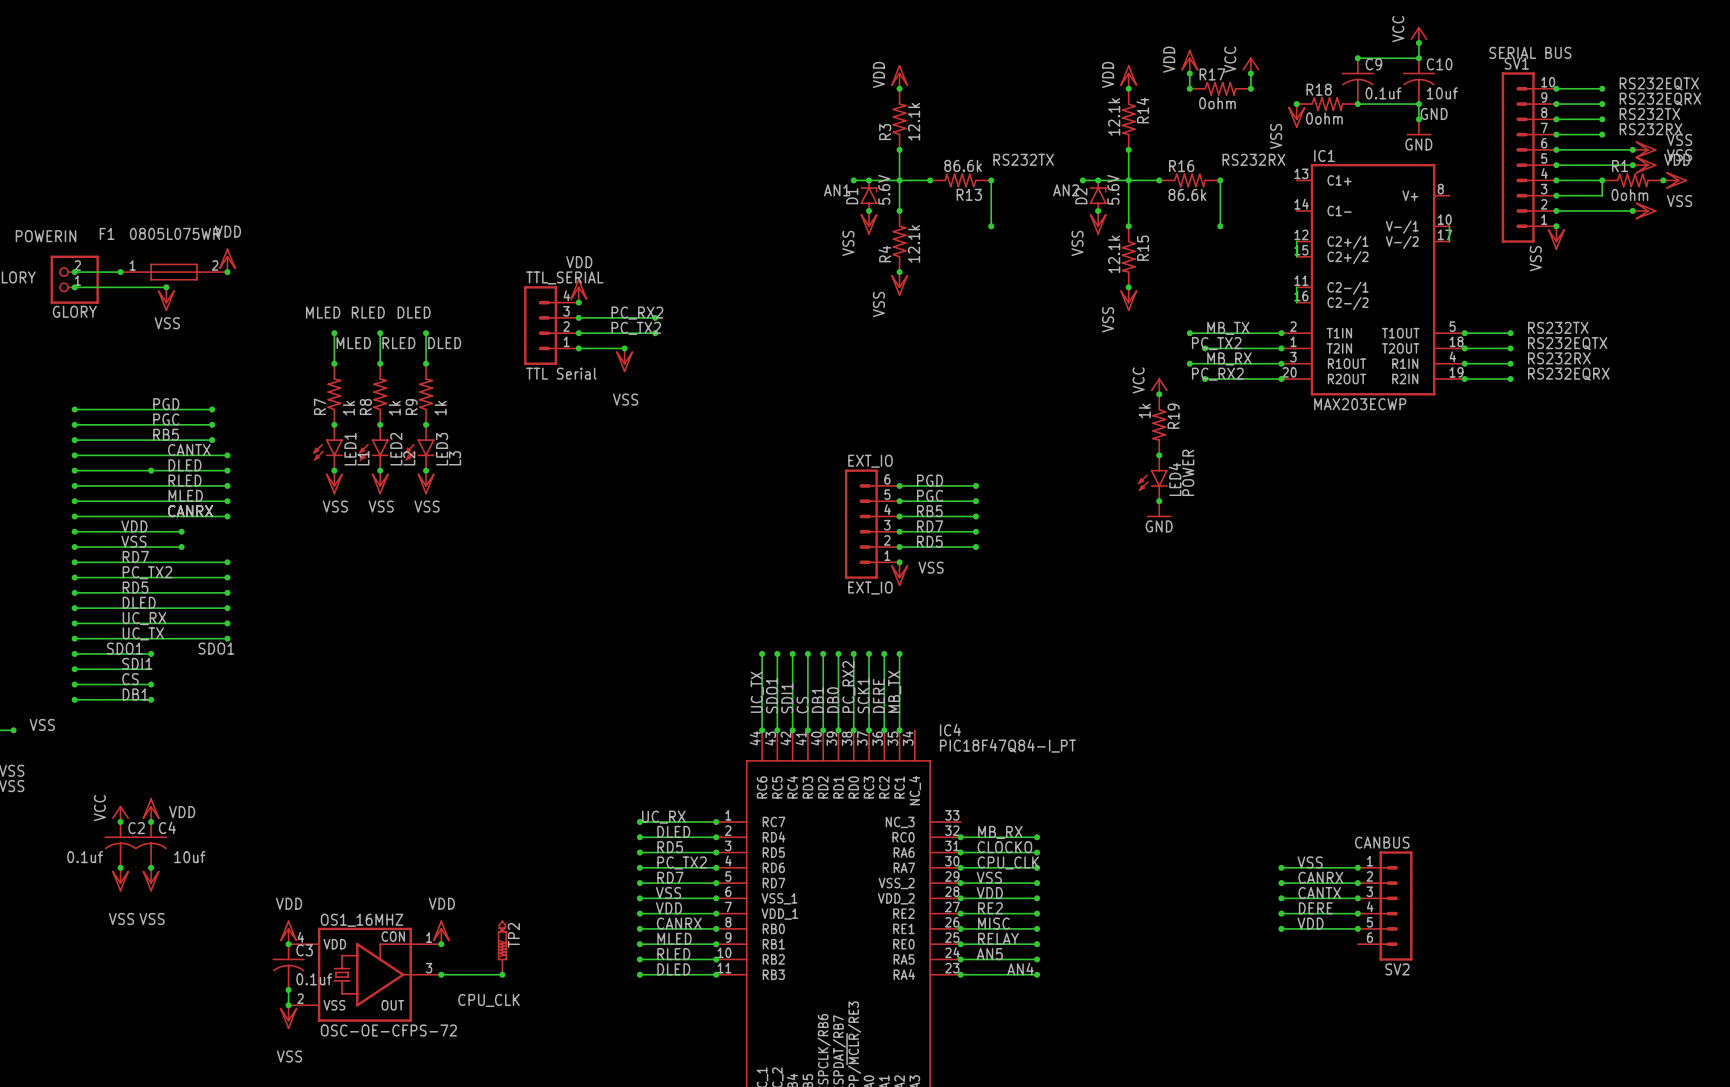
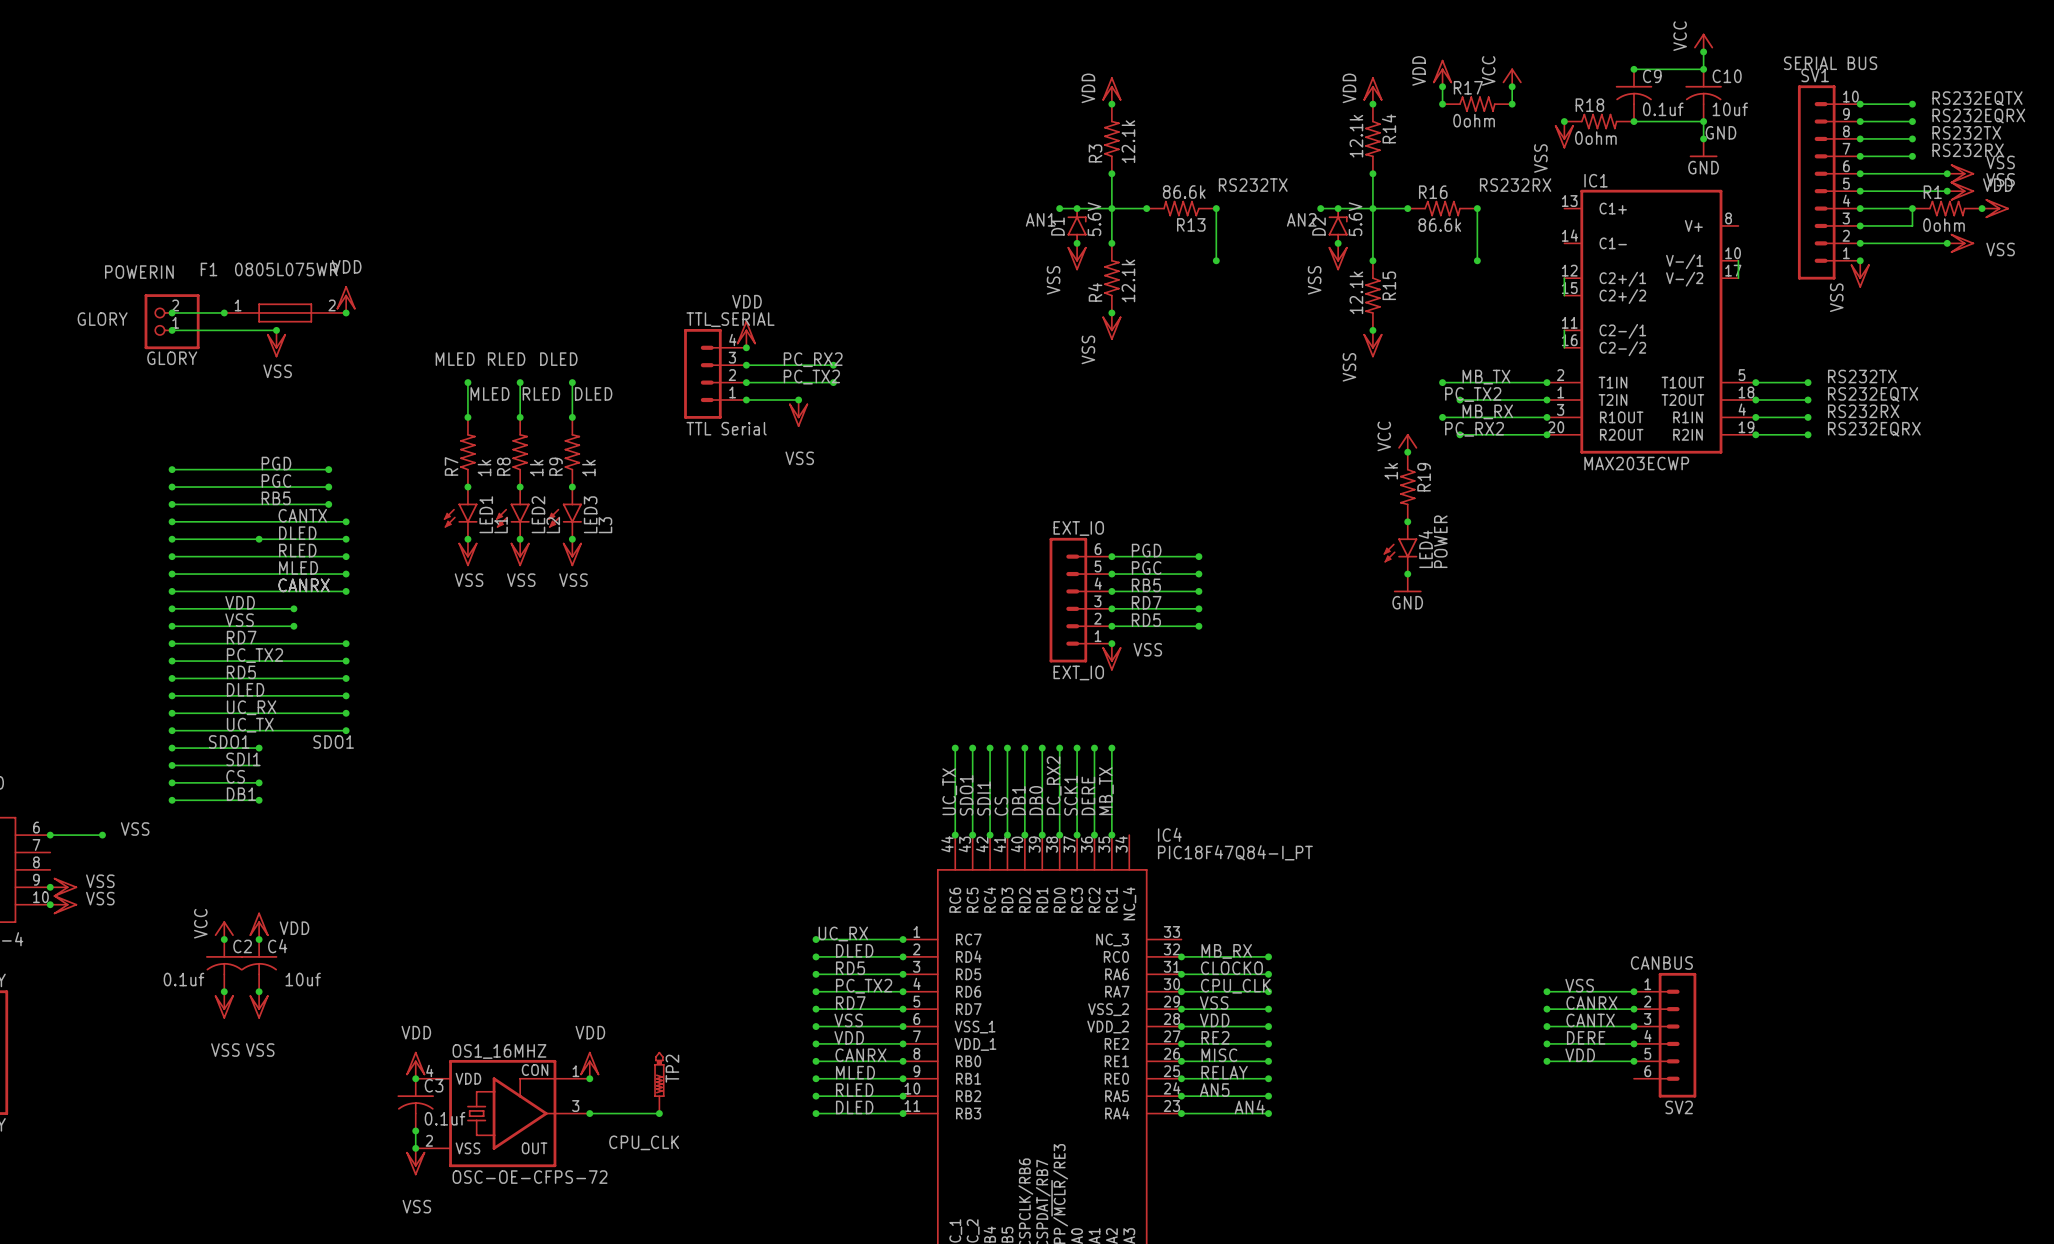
power symbol text position: VSS (1679, 201) -> VSS (2000, 249)

